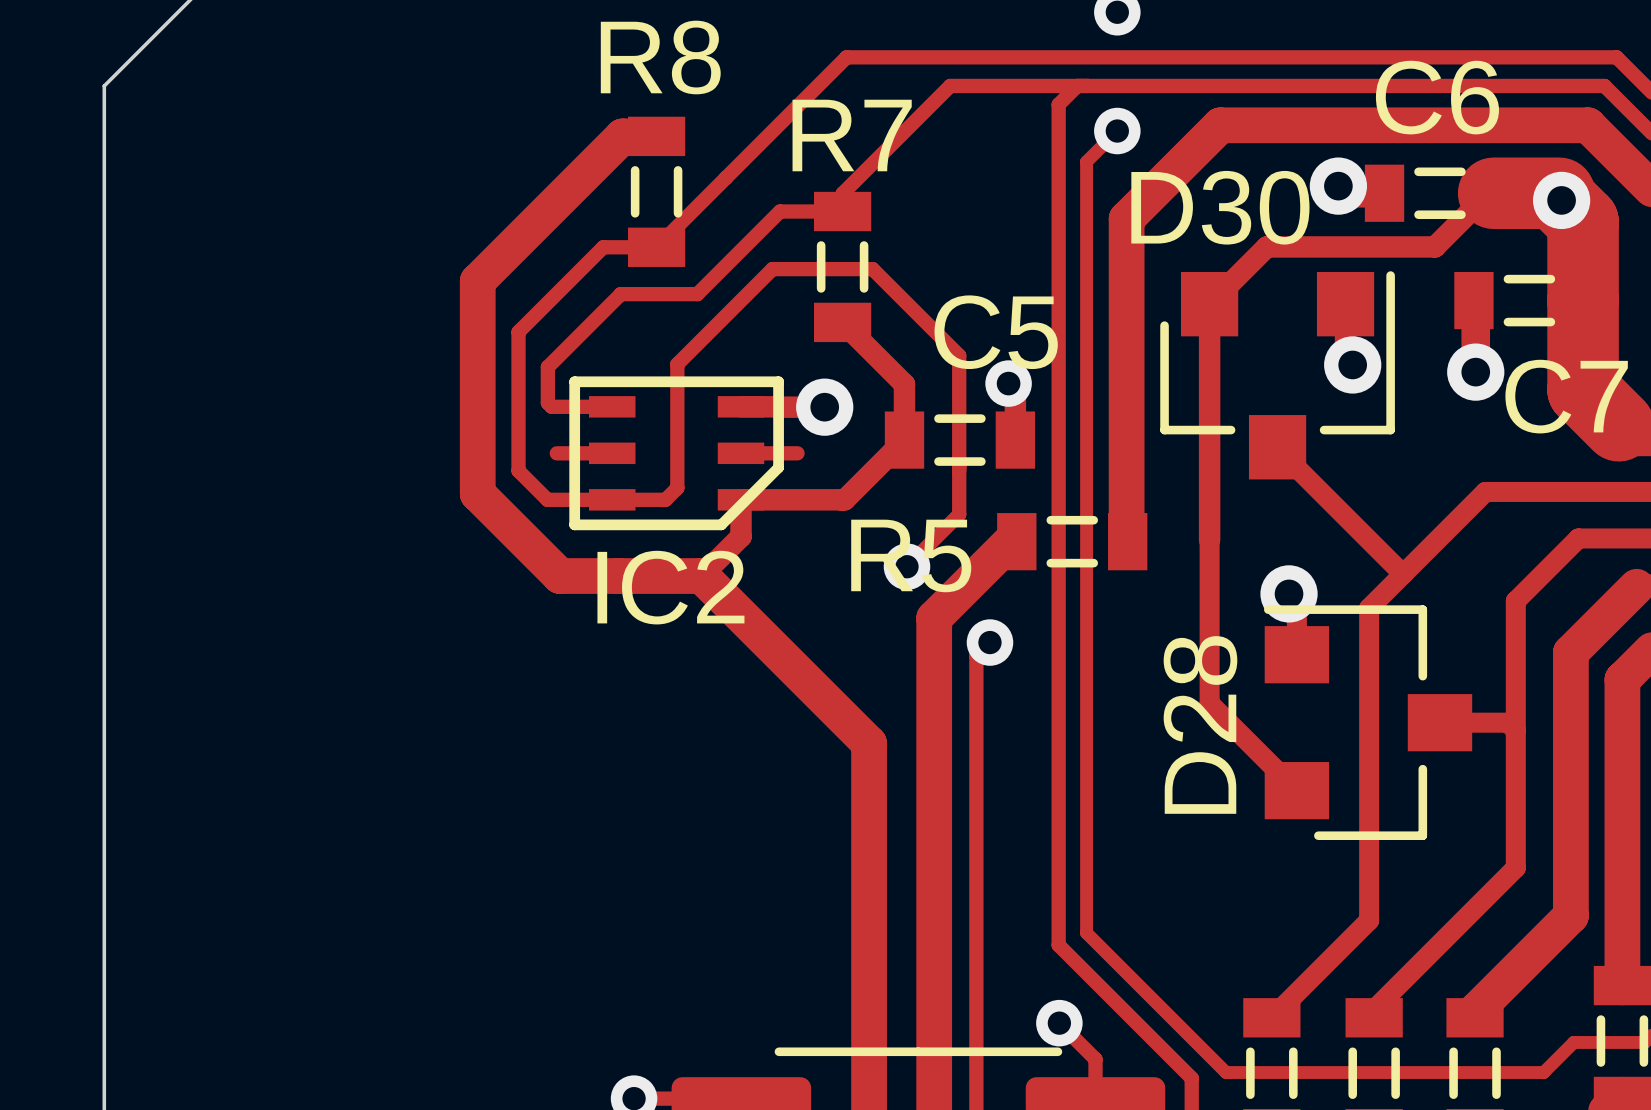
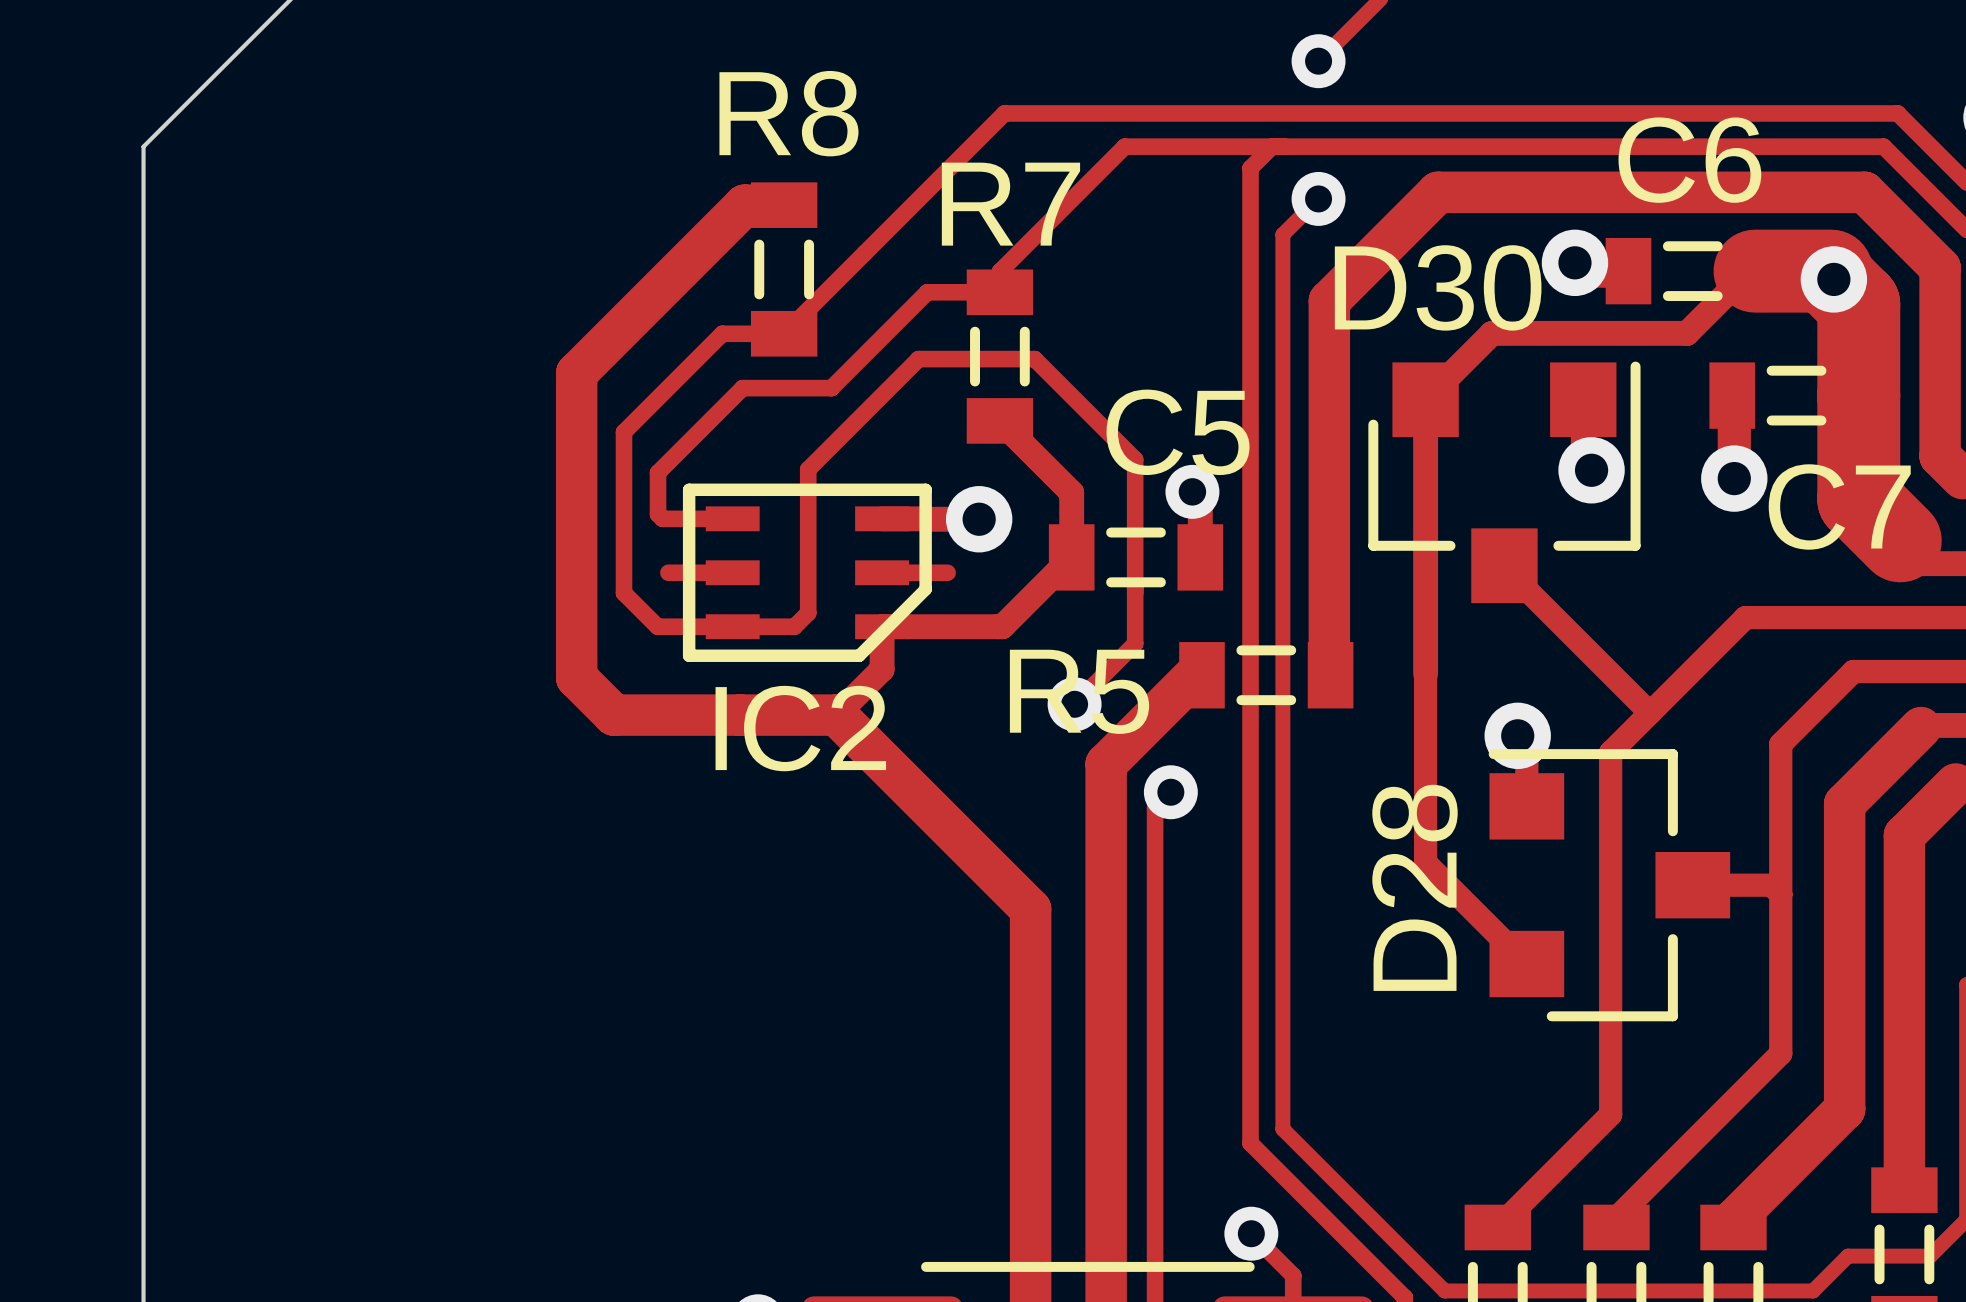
track: (477, 493) (560, 576) -> (576, 619) (576, 677) (614, 715) (672, 715)

